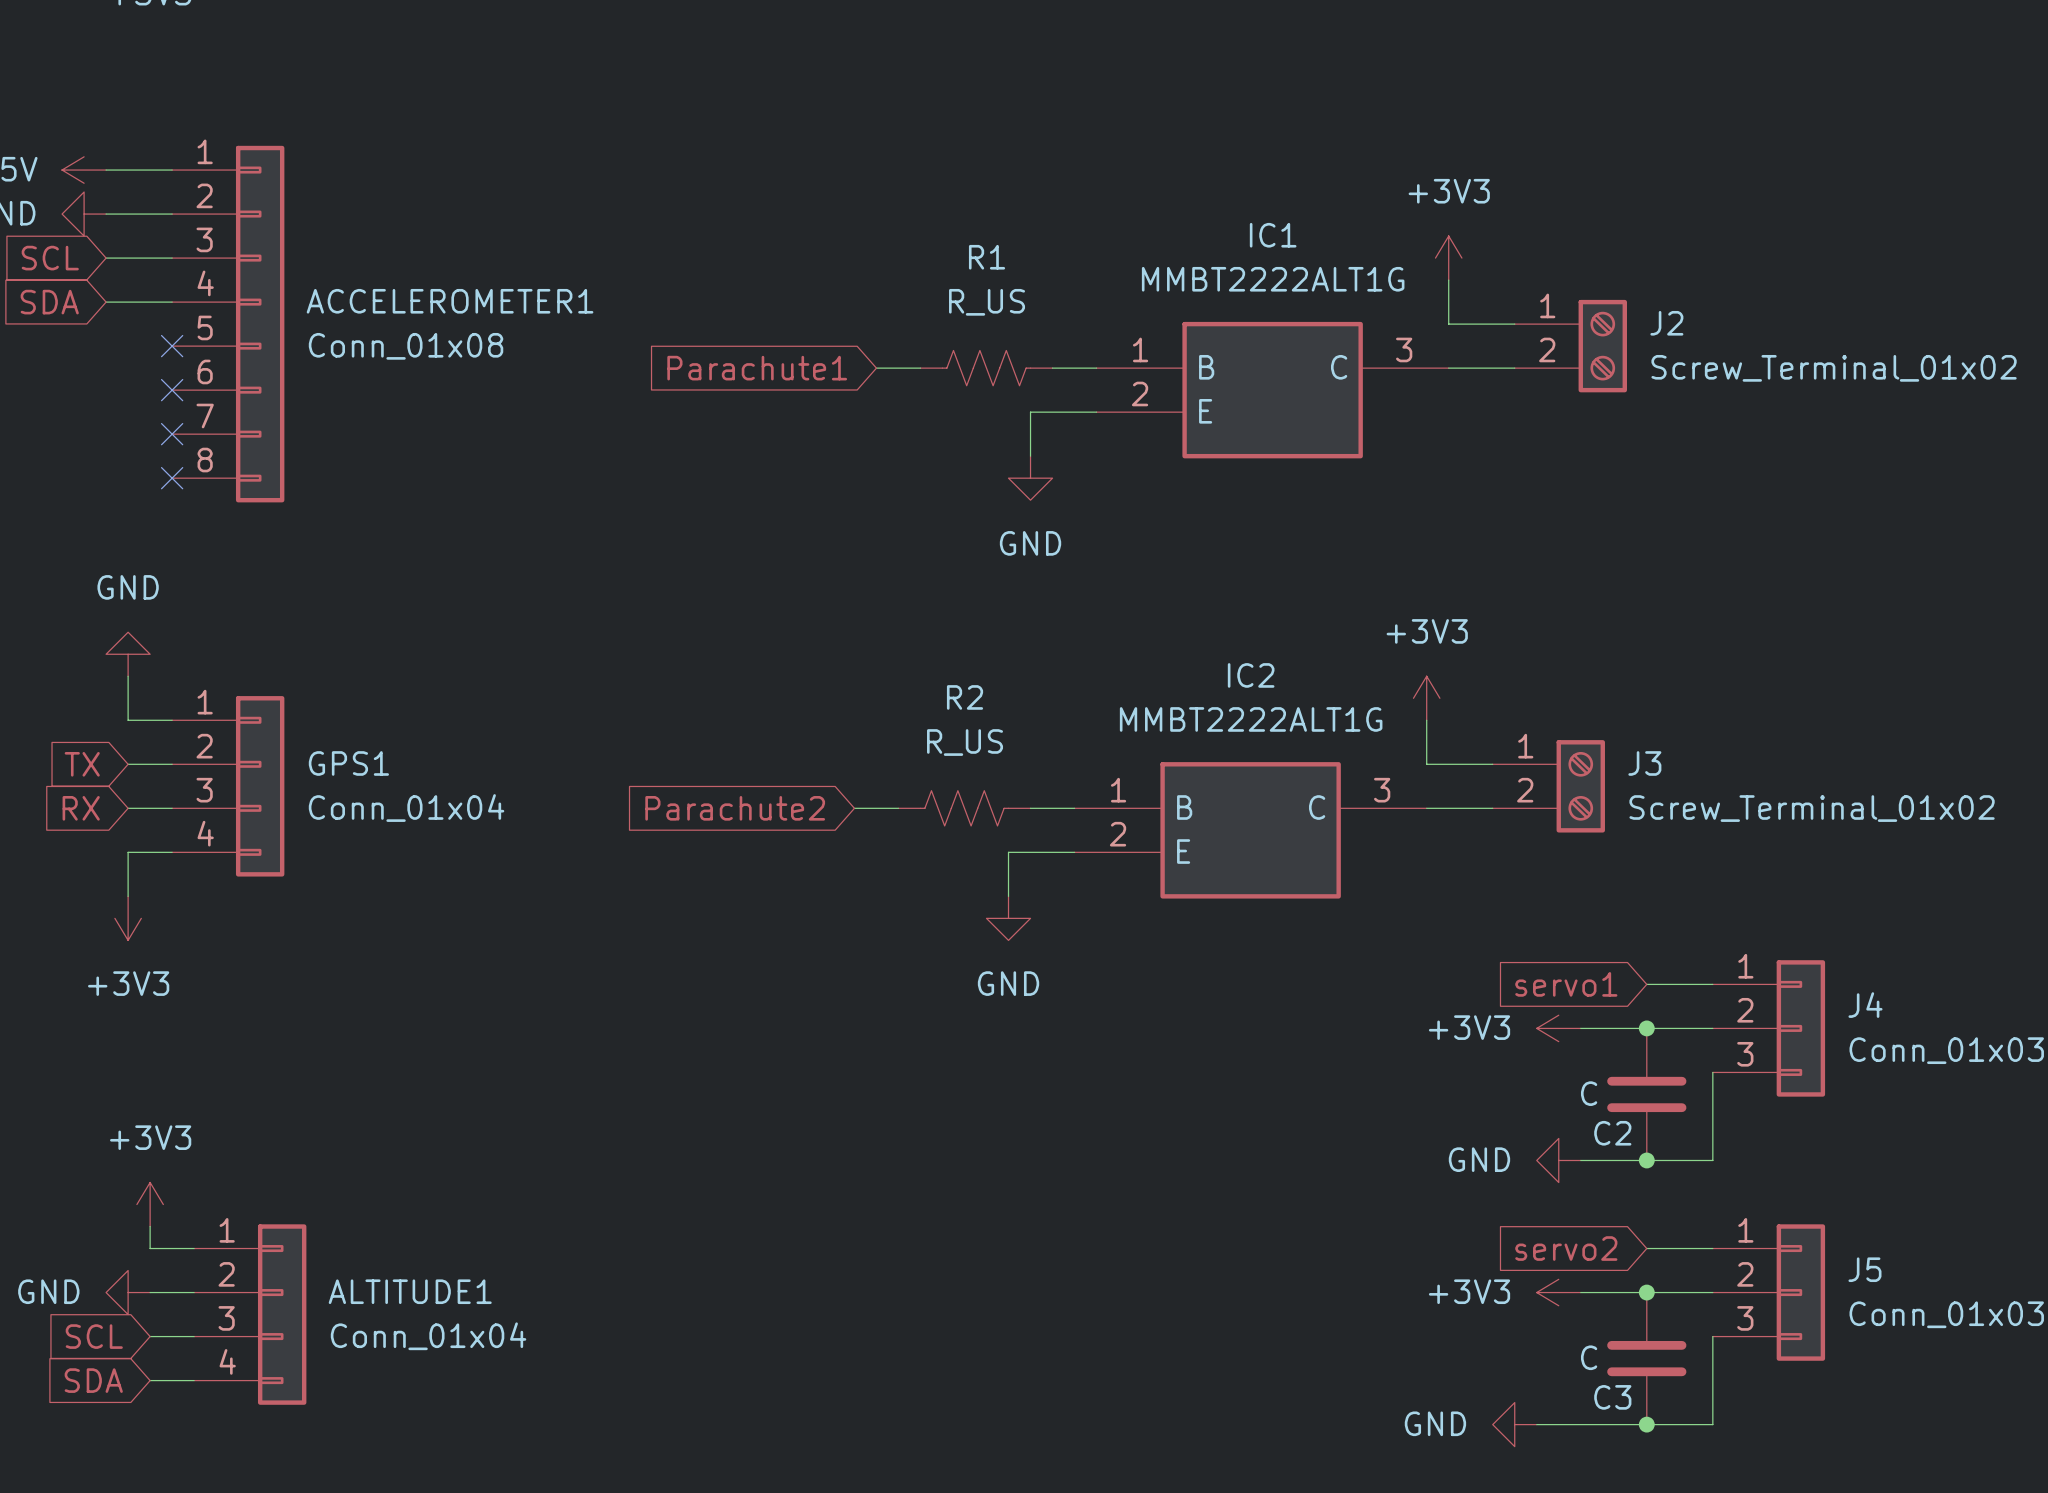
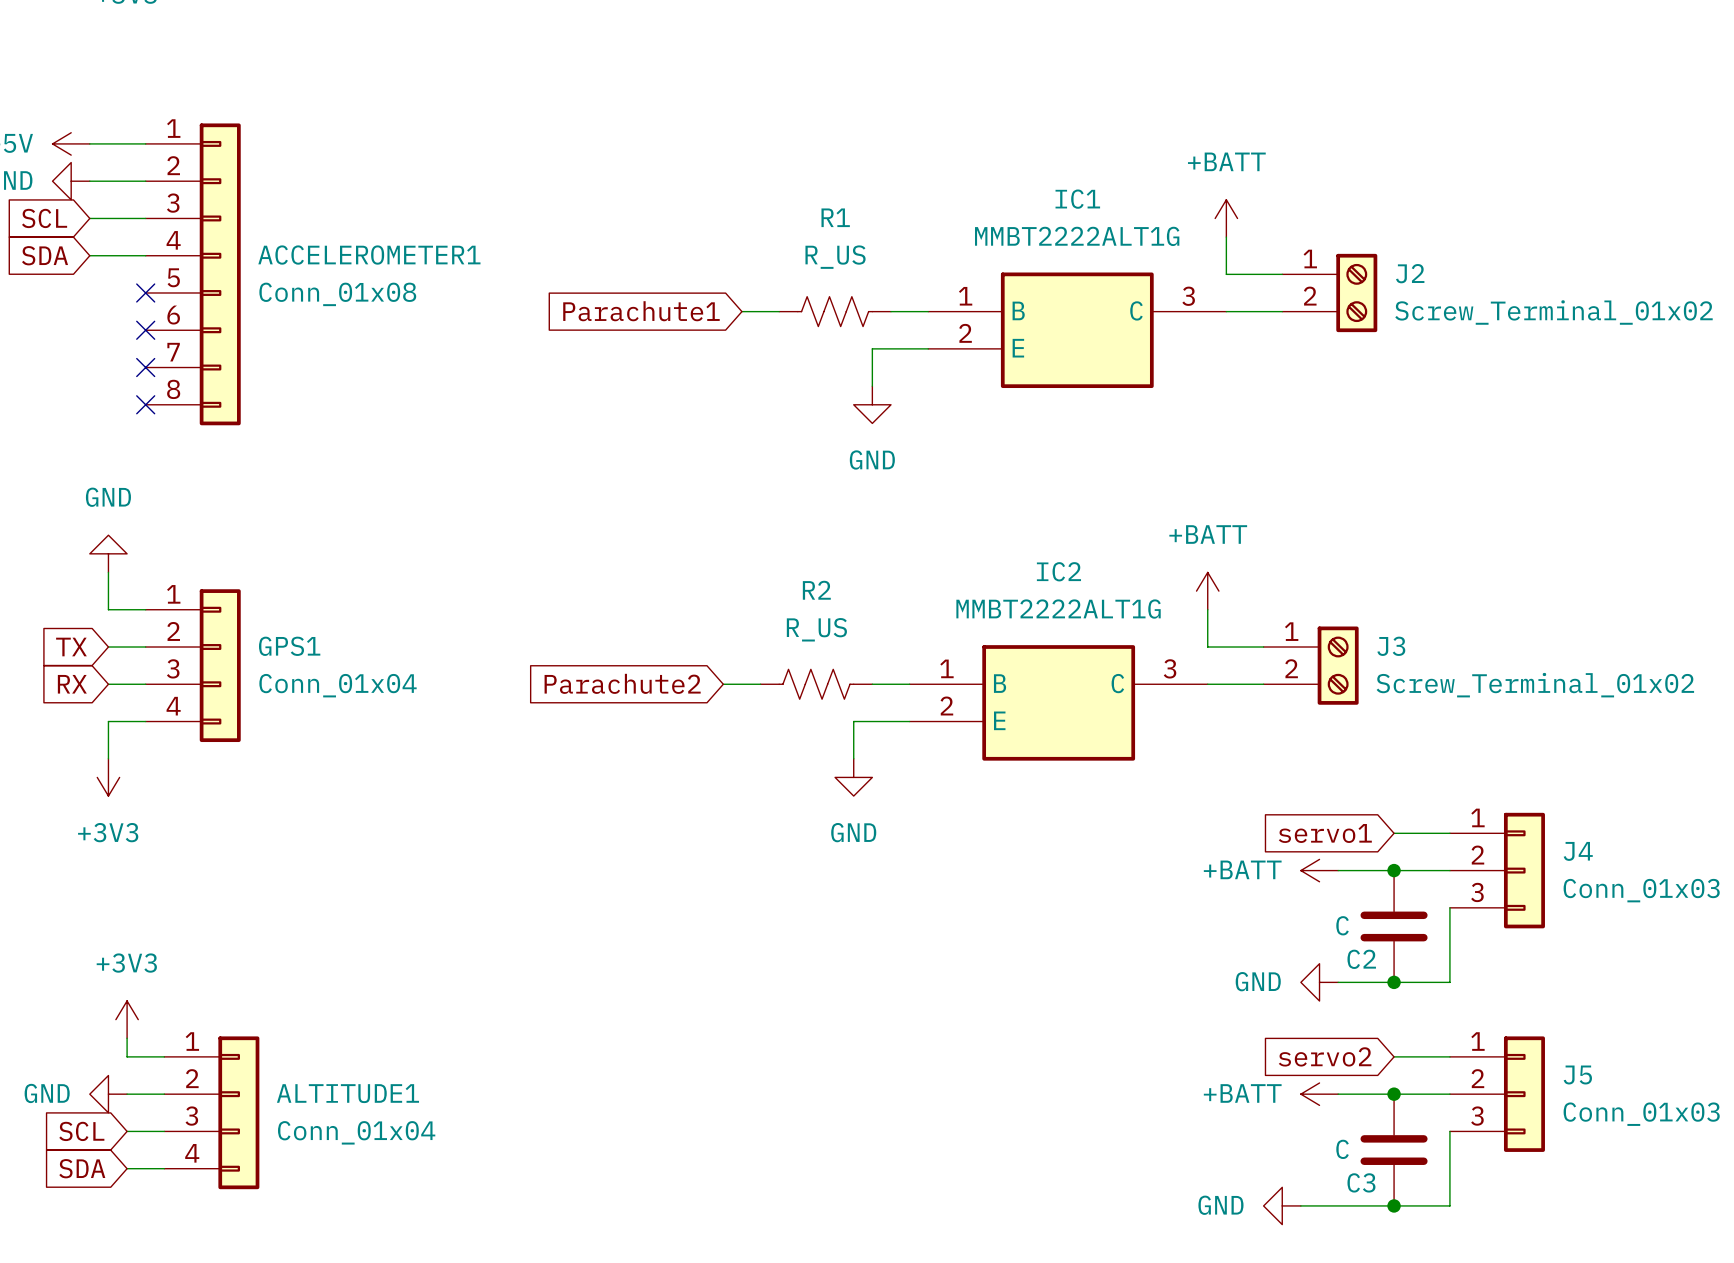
power symbol: +3V3 (1448, 258) -> +BATT (1226, 218)
power symbol: +3V3 (1426, 698) -> +BATT (1207, 591)
power symbol: +3V3 (1558, 1028) -> +BATT (1319, 870)
power symbol: +3V3 (1558, 1292) -> +BATT (1319, 1094)

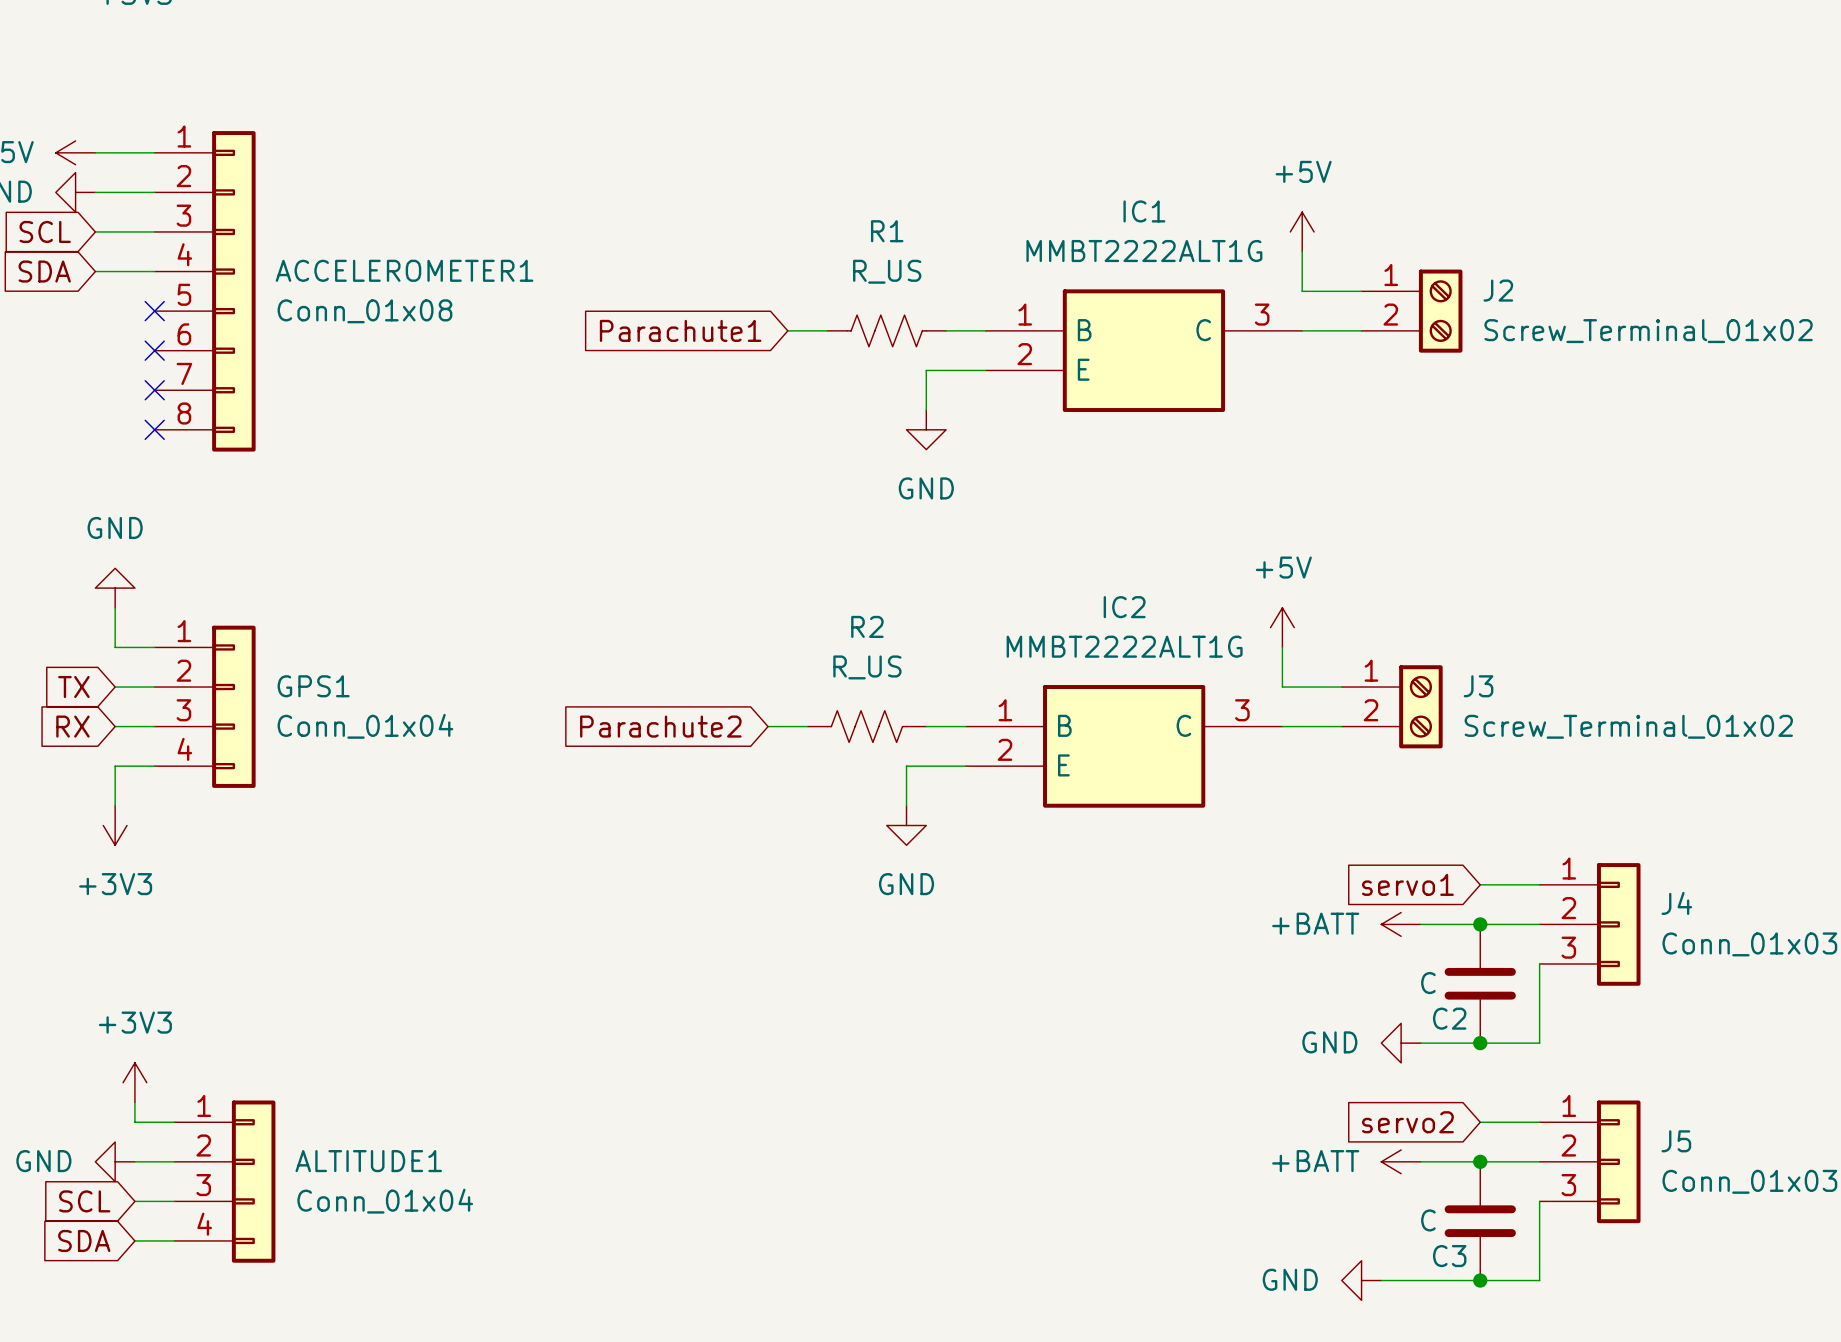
power symbol: +BATT (1226, 218) -> +5V (1302, 231)
power symbol: +BATT (1207, 591) -> +5V (1282, 627)

